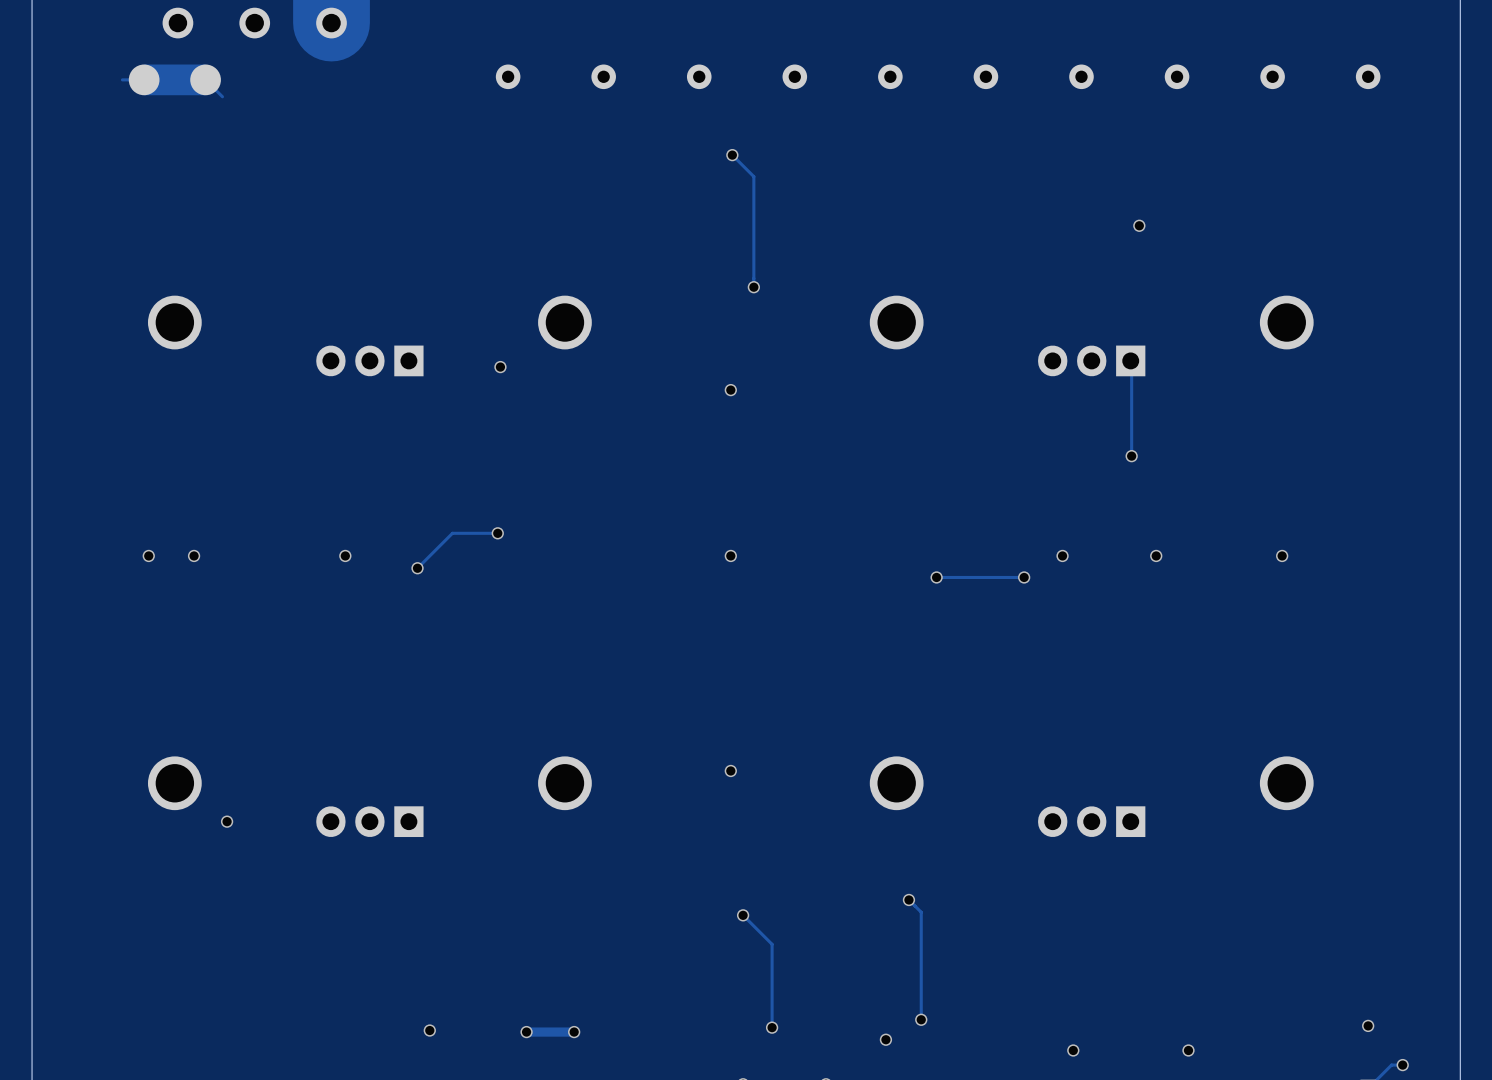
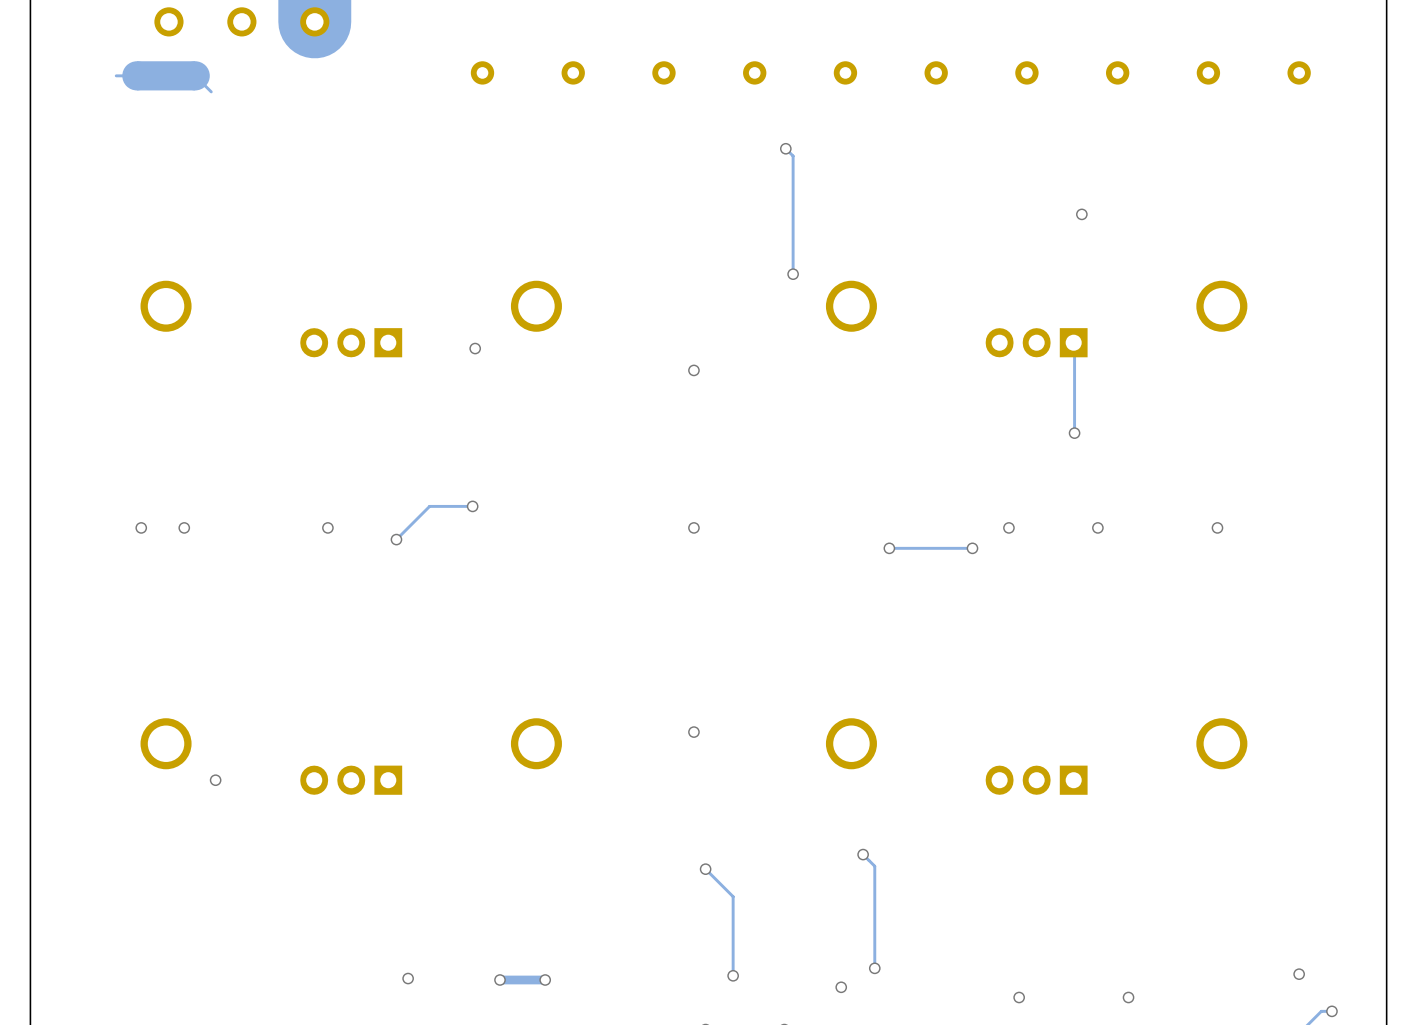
track: (732, 155) (753, 176) (753, 287) -> none
via: (732, 155) -> none
track: none -> (785, 148) (793, 156) (793, 274)
via: none -> (785, 148)
via: (753, 287) -> none
via: none -> (793, 274)

